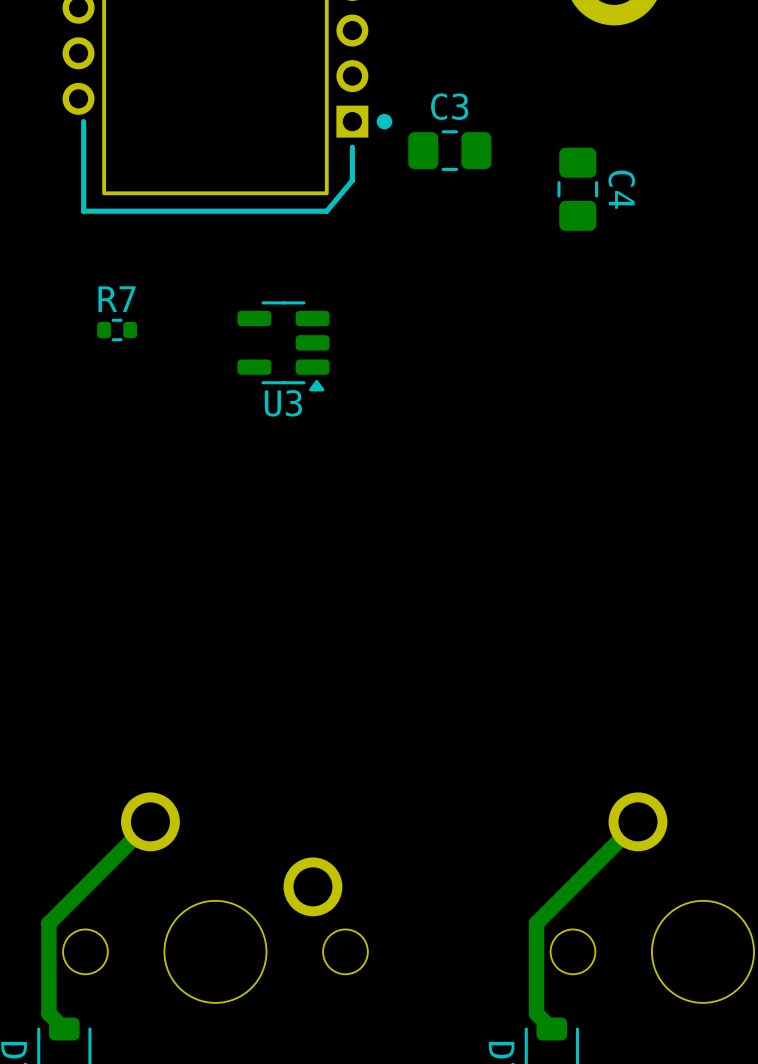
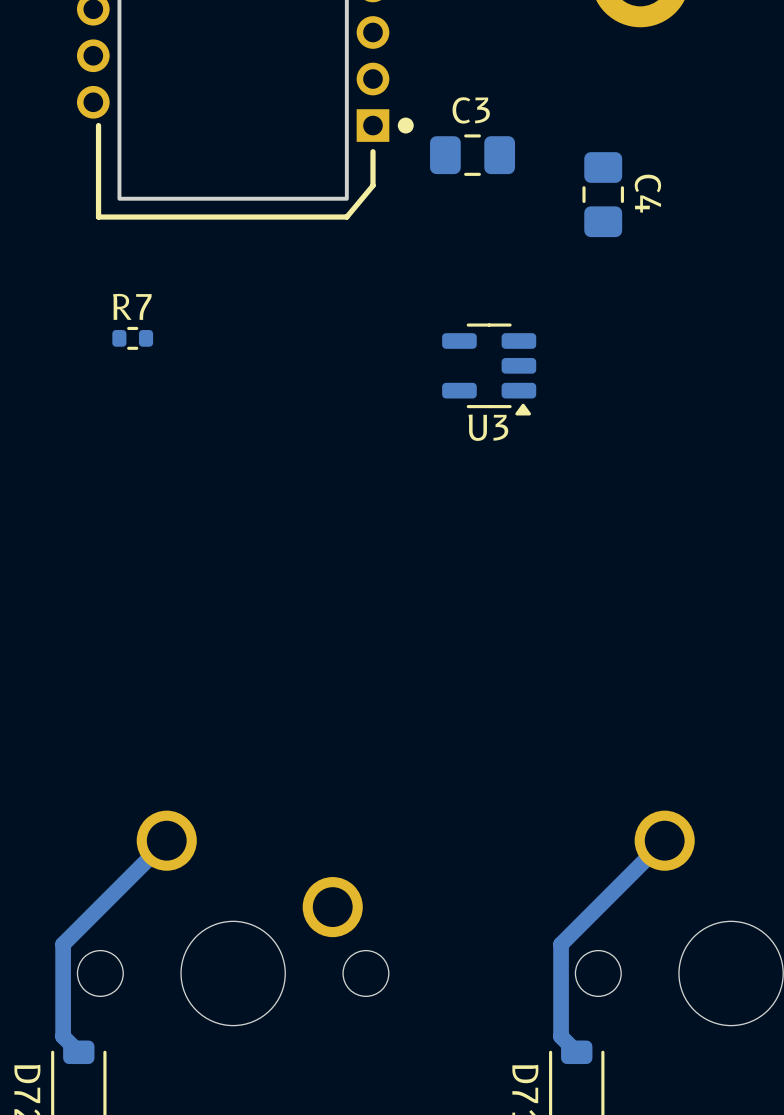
U3 position: (283, 346) -> (489, 369)

